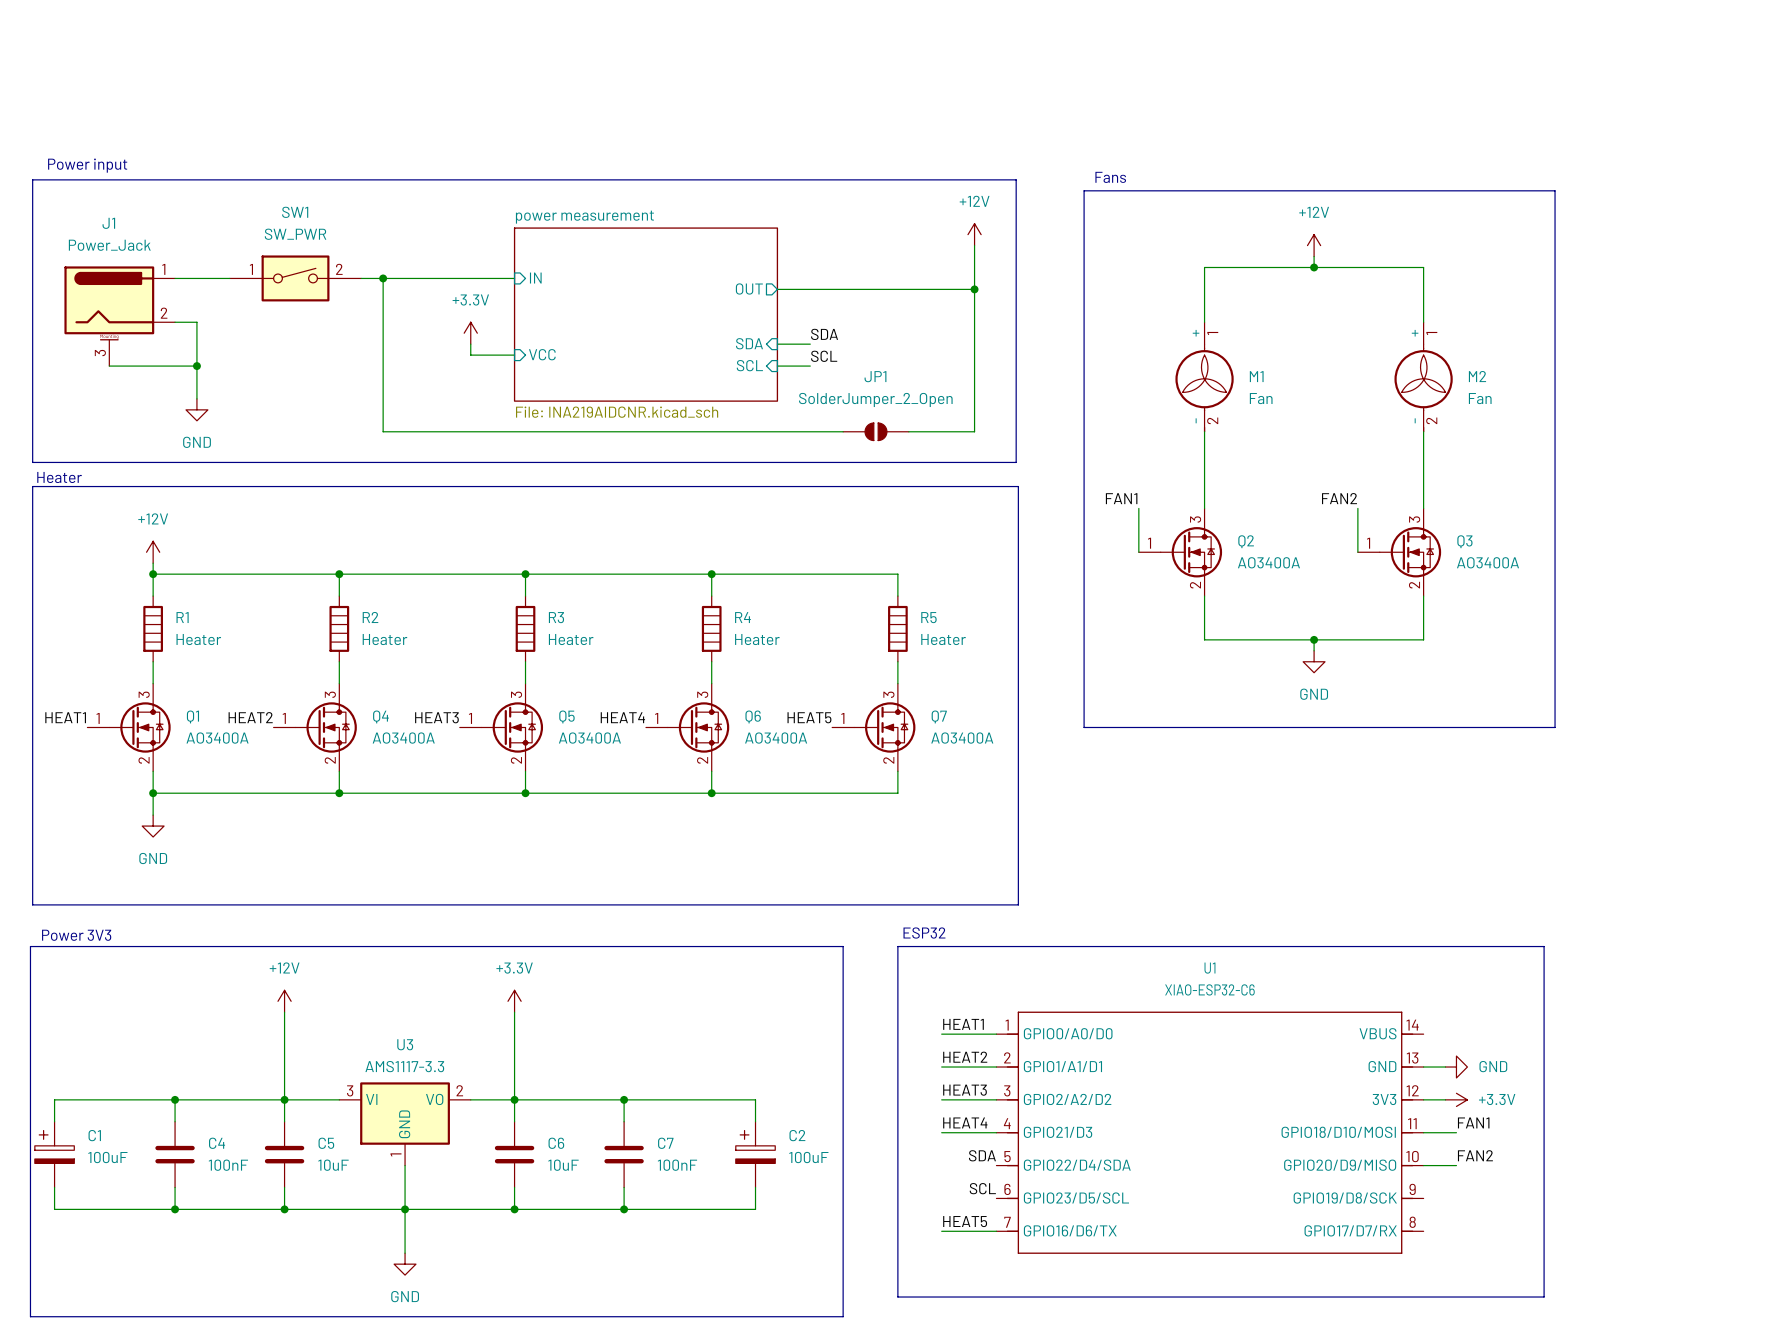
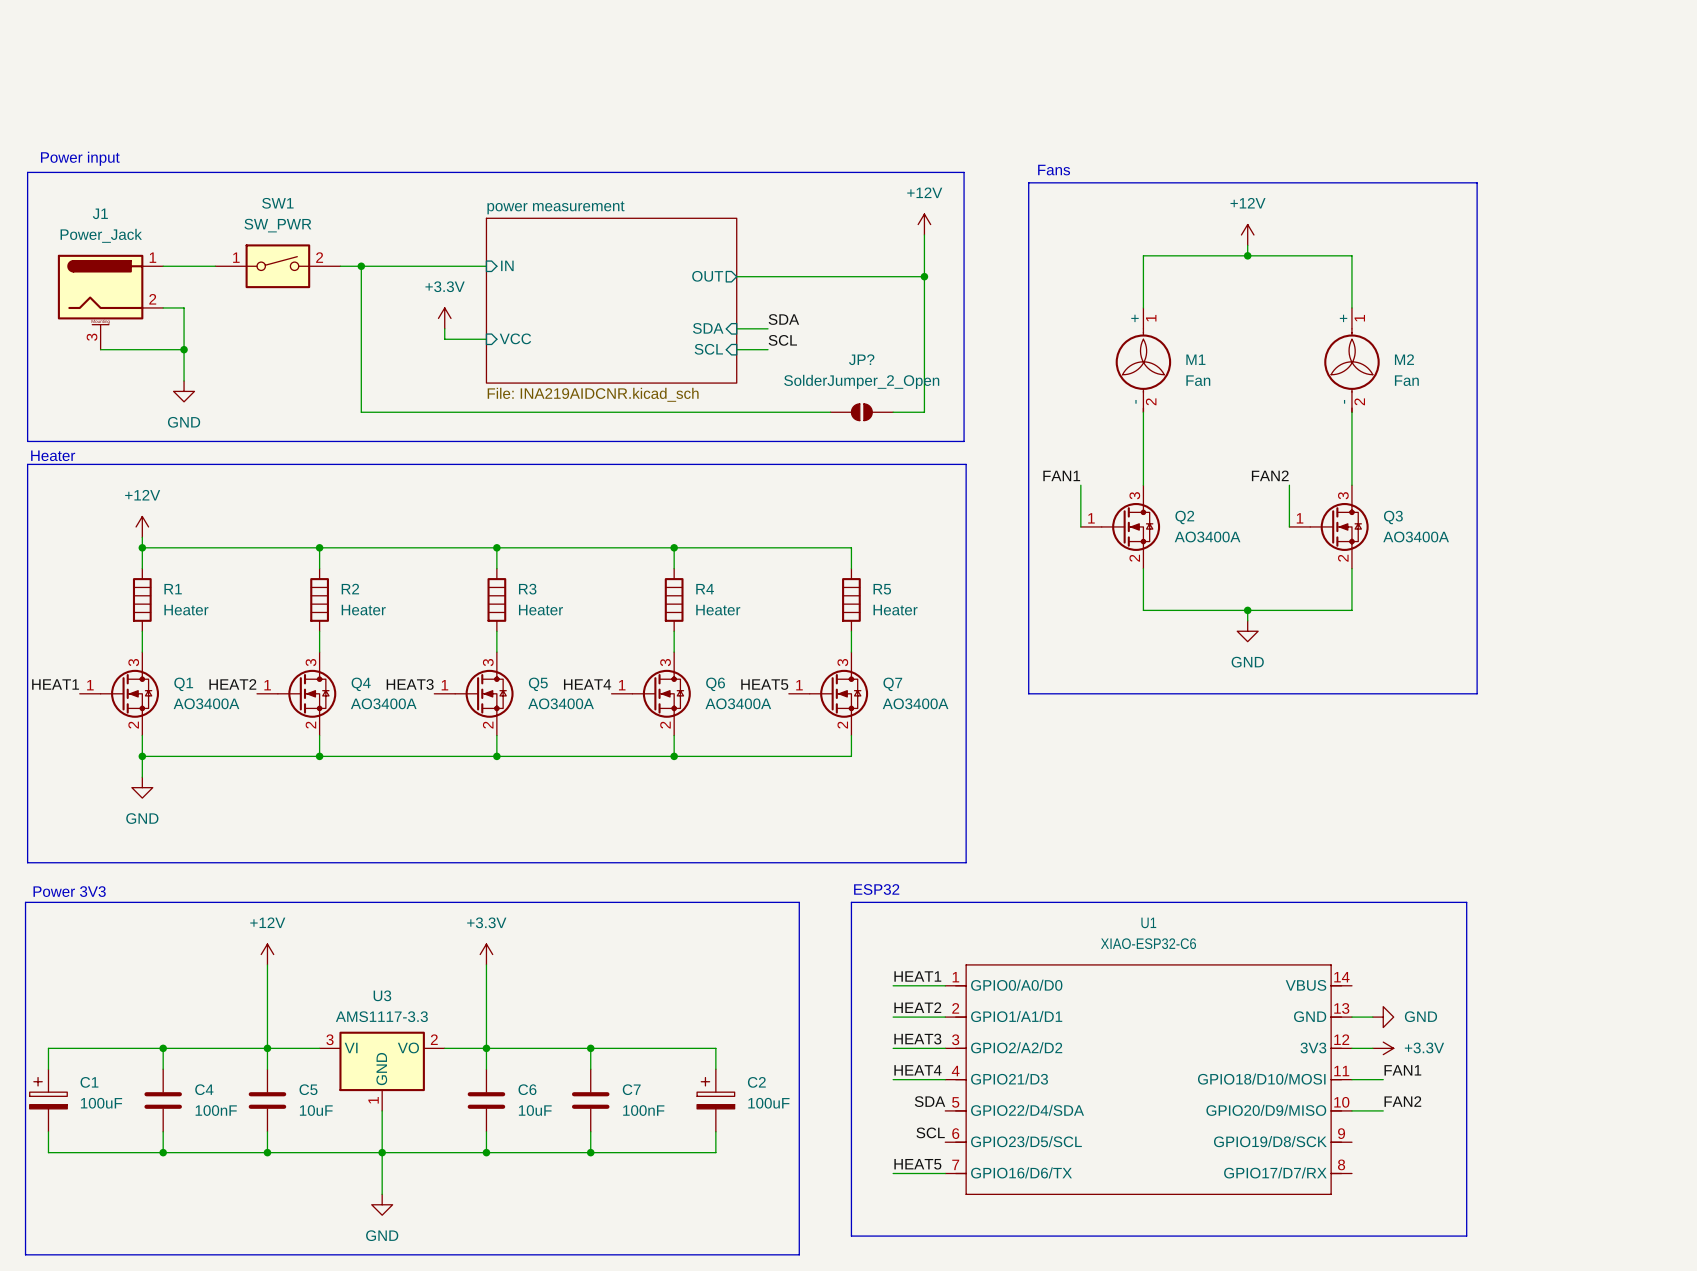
JP1: SolderJumper_2_Open (875, 431) -> none
JP?: none -> SolderJumper_2_Open (861, 412)

